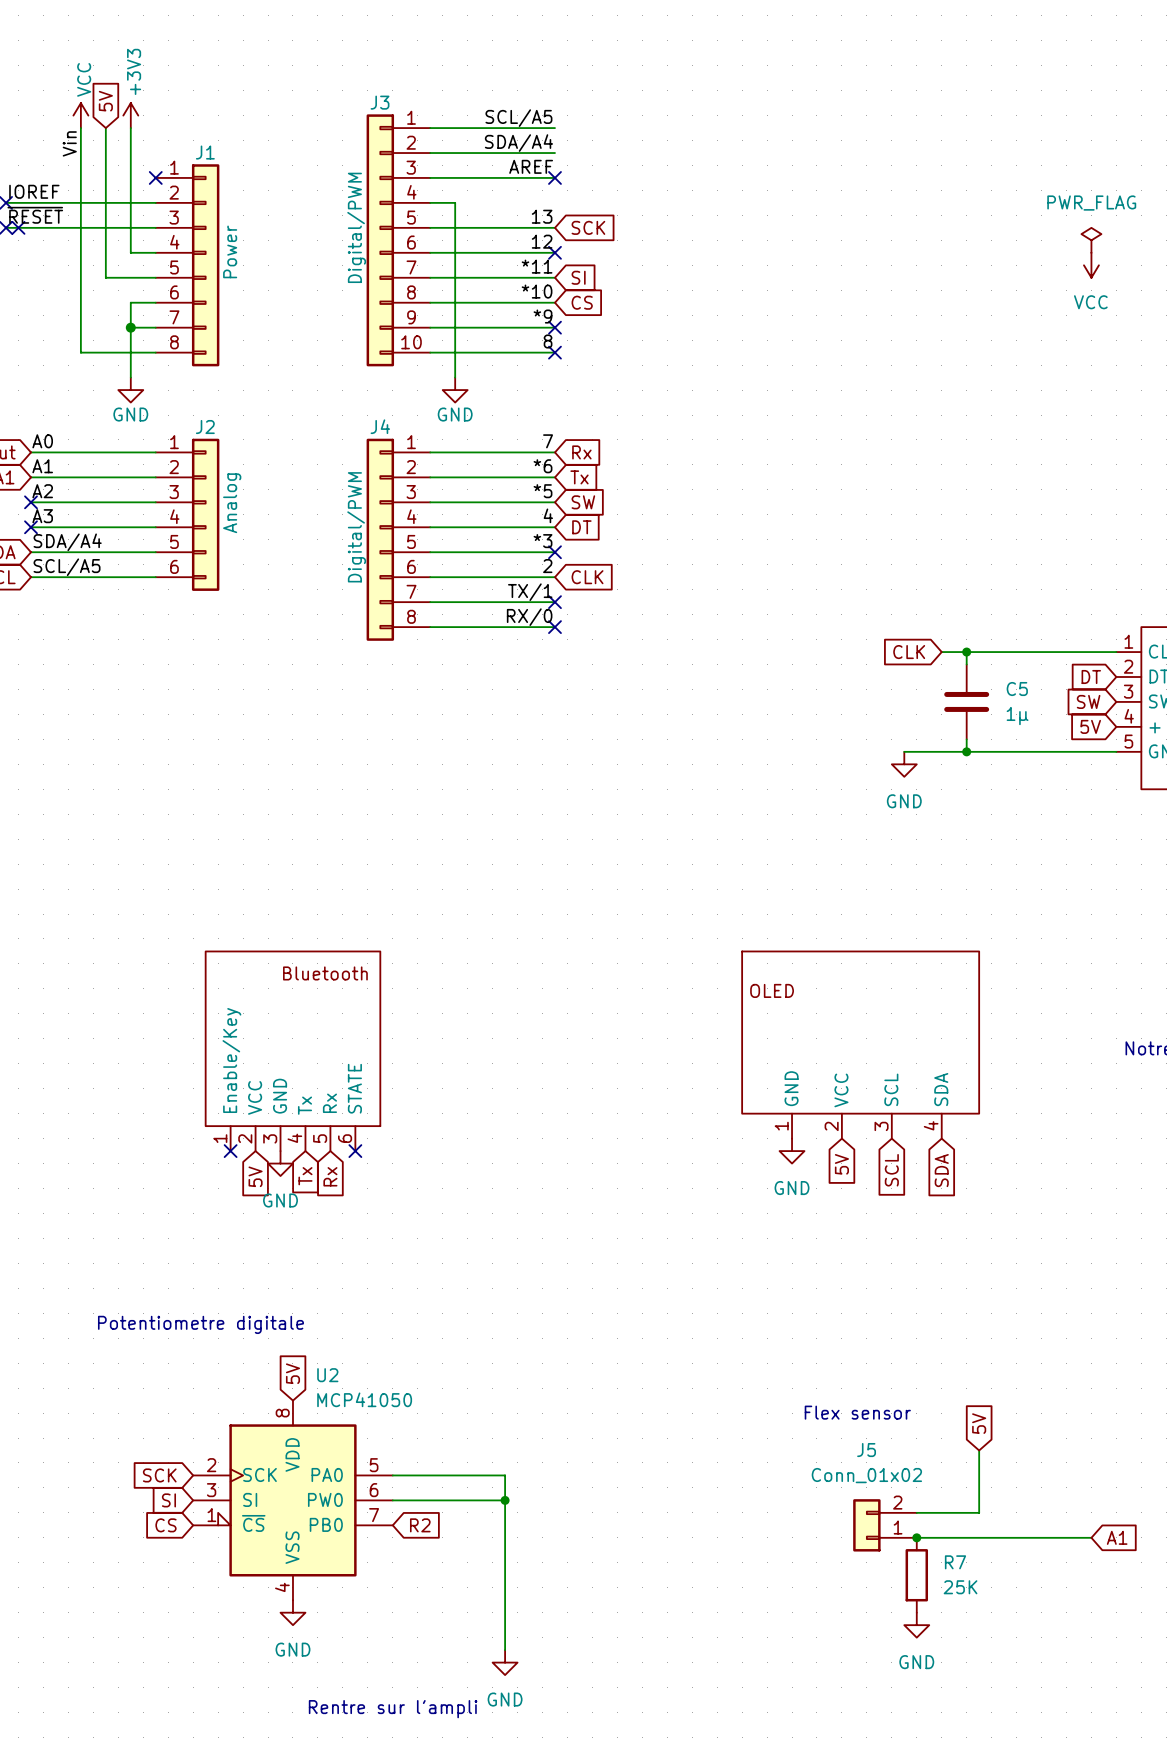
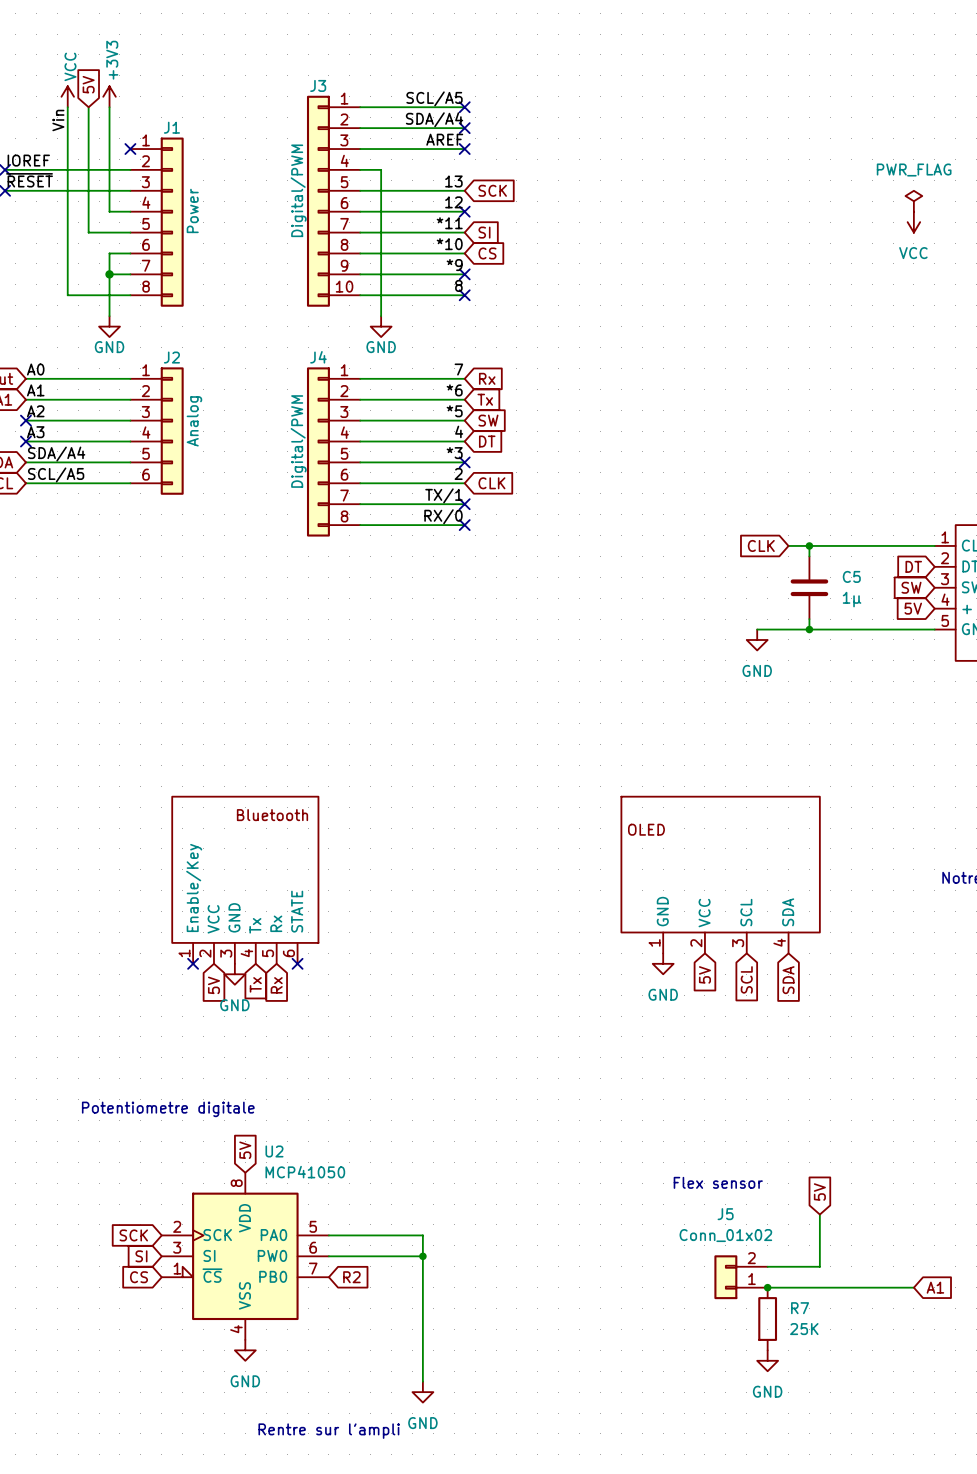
no-connect mark: none -> (464, 107)
no-connect mark: none -> (464, 128)
no-connect mark: (18, 227) -> none

